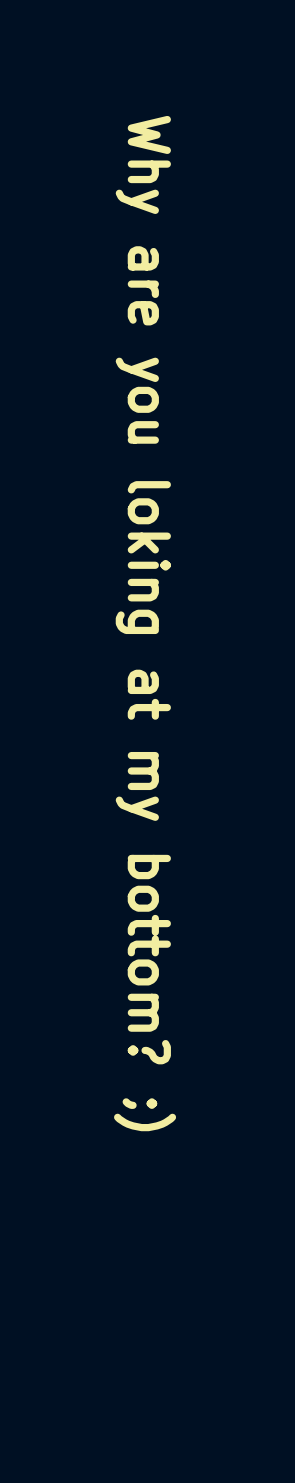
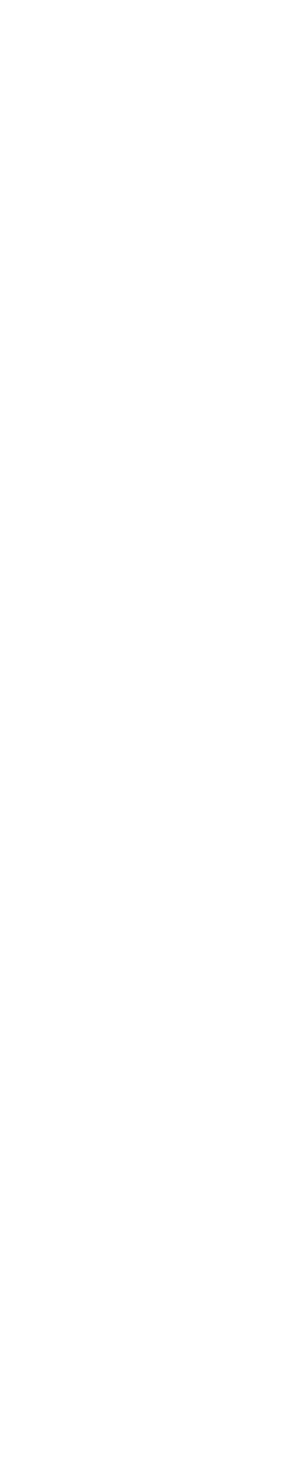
text: Why are you loking at my bottom? ;) (145, 623) -> none

